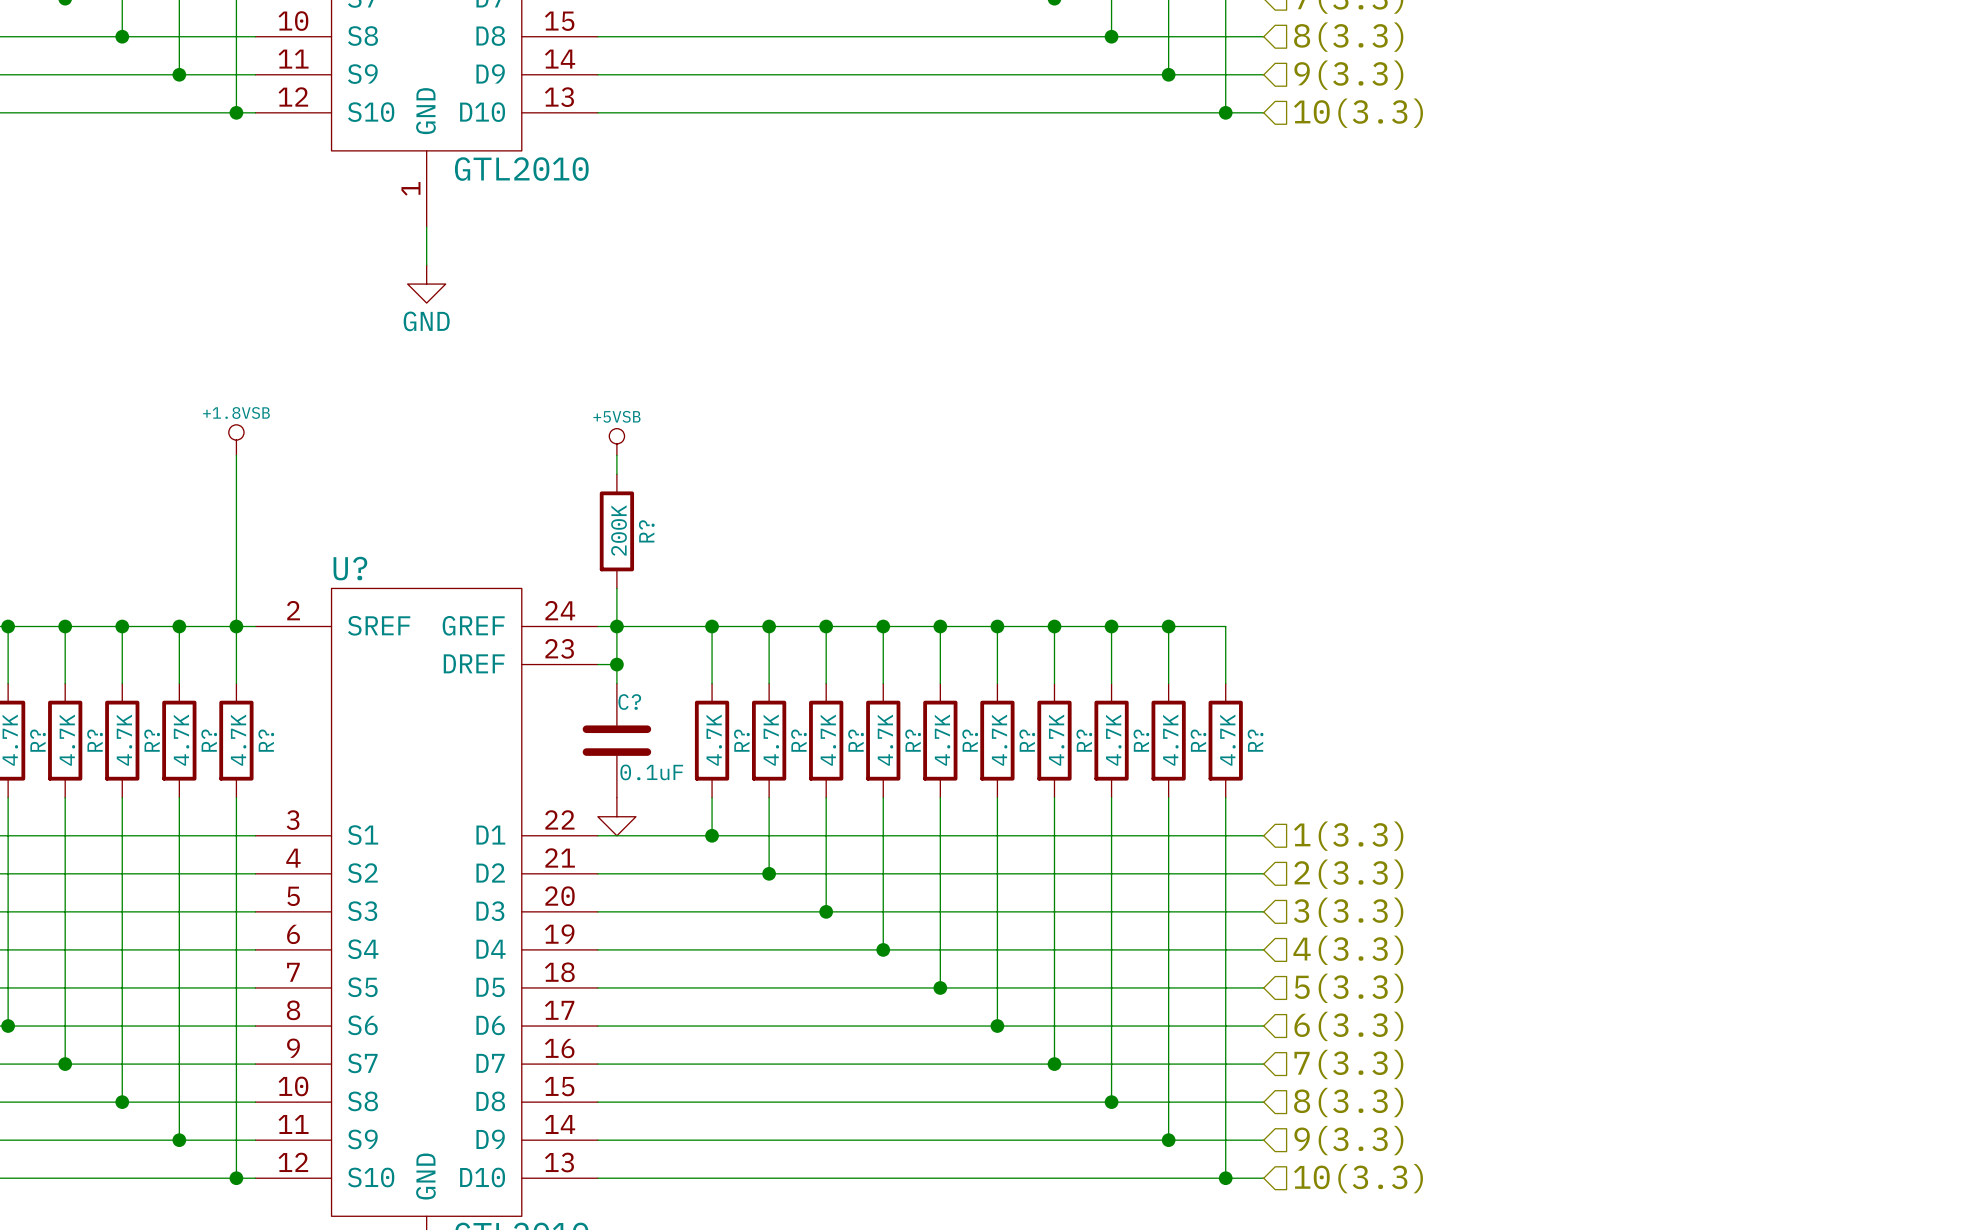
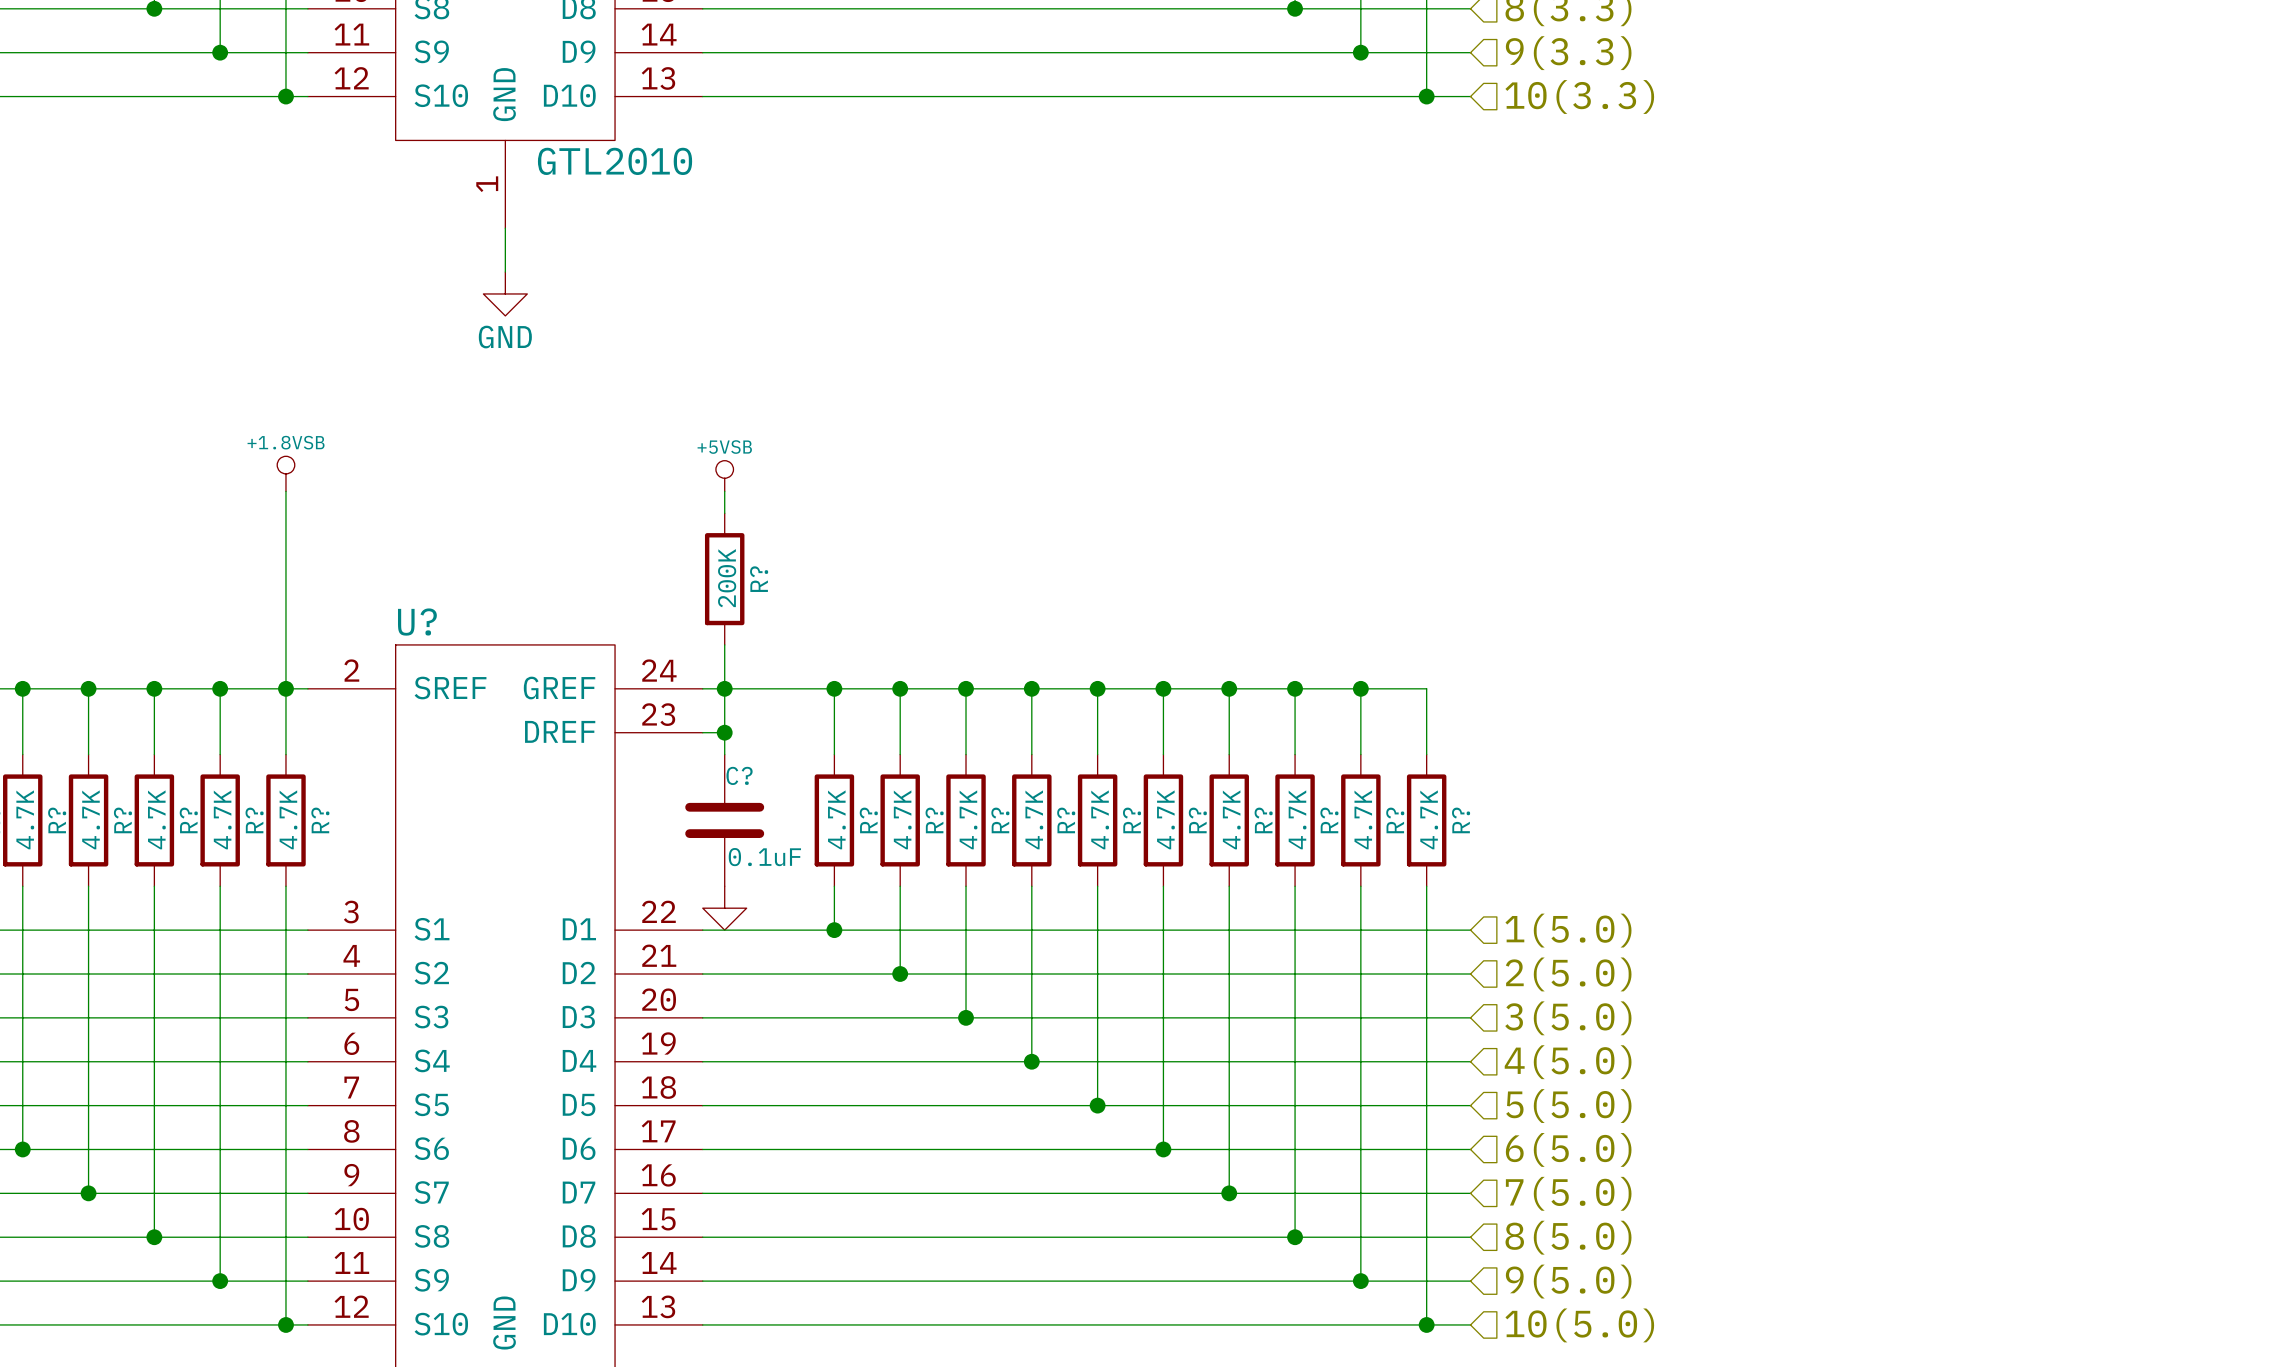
hierarchical label: 1(3.3) (1348, 836) -> 1(5.0) (1568, 930)
hierarchical label: 2(3.3) (1348, 874) -> 2(5.0) (1568, 974)
hierarchical label: 3(3.3) (1348, 912) -> 3(5.0) (1568, 1018)
hierarchical label: 4(3.3) (1348, 950) -> 4(5.0) (1568, 1062)
hierarchical label: 5(3.3) (1349, 988) -> 5(5.0) (1568, 1106)
hierarchical label: 6(3.3) (1348, 1026) -> 6(5.0) (1568, 1149)
hierarchical label: 7(3.3) (1348, 1064) -> 7(5.0) (1568, 1193)
hierarchical label: 8(3.3) (1348, 1102) -> 8(5.0) (1568, 1237)
hierarchical label: 9(3.3) (1348, 1140) -> 9(5.0) (1568, 1281)
hierarchical label: 10(3.3) (1358, 1178) -> 10(5.0) (1579, 1325)

